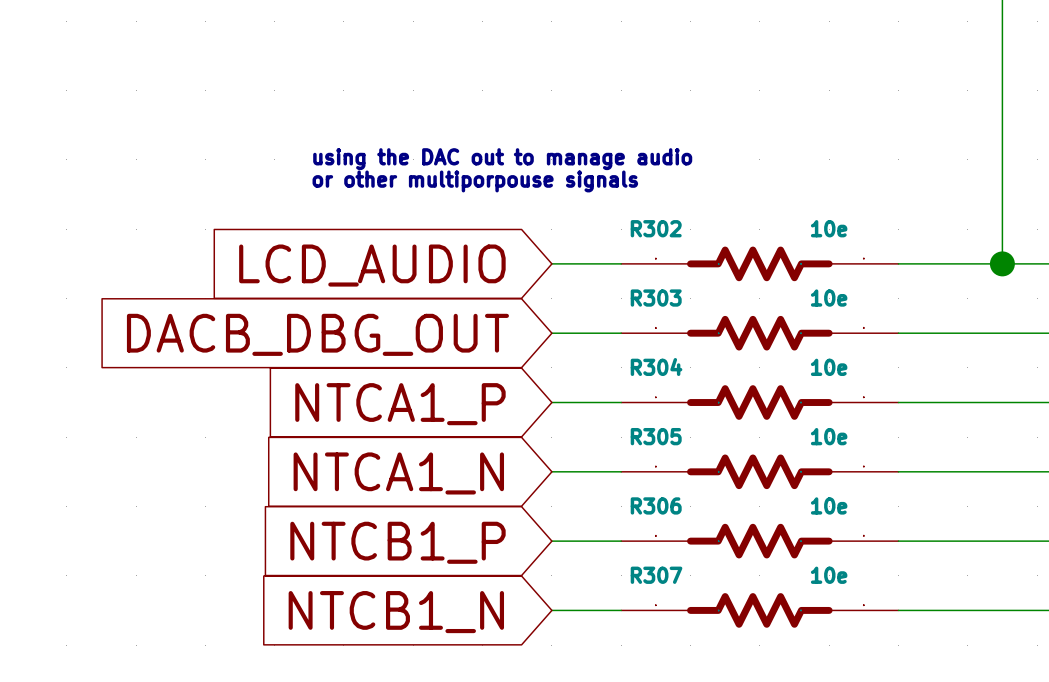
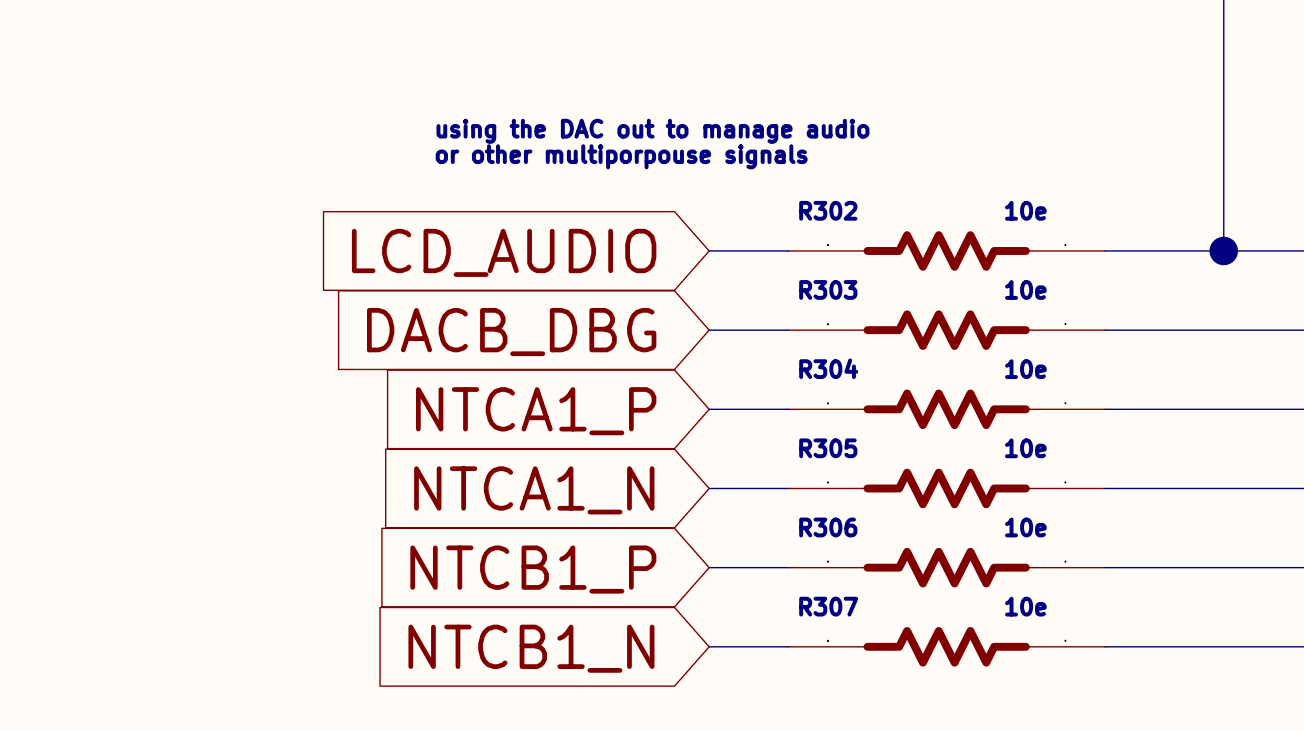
global label: DACB_DBG_OUT (317, 334) -> DACB_DBG (511, 332)

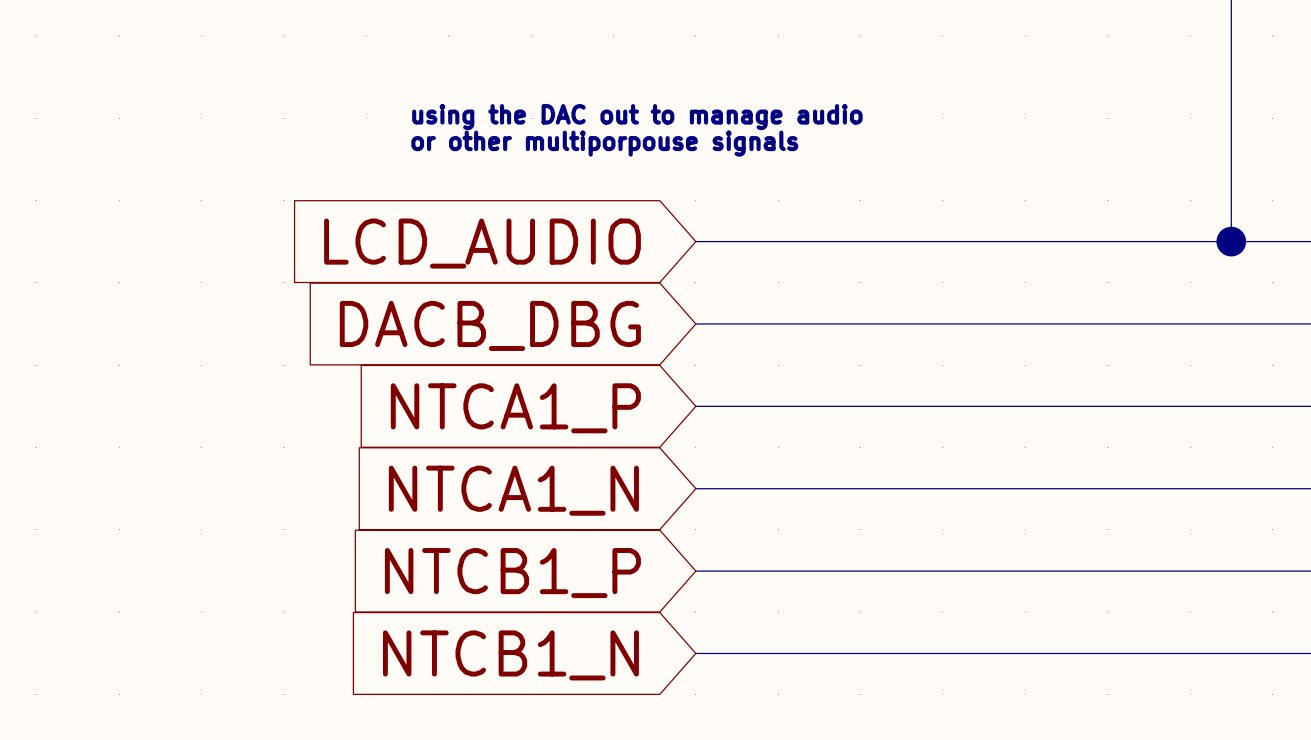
R302: 10e (946, 250) -> none
R303: 10e (946, 330) -> none
R304: 10e (946, 409) -> none
R305: 10e (946, 488) -> none
R306: 10e (946, 567) -> none
R307: 10e (946, 646) -> none

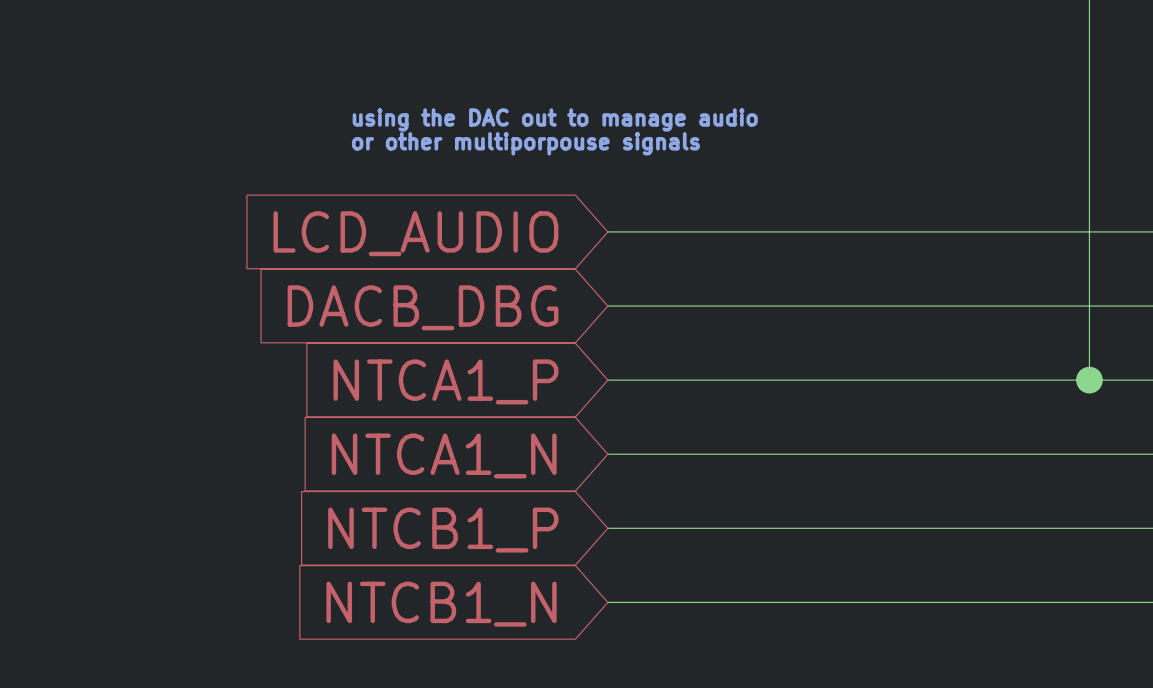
wire: none -> (1089, 231) (1089, 380)
junction: (1231, 241) -> none
junction: none -> (1089, 380)

